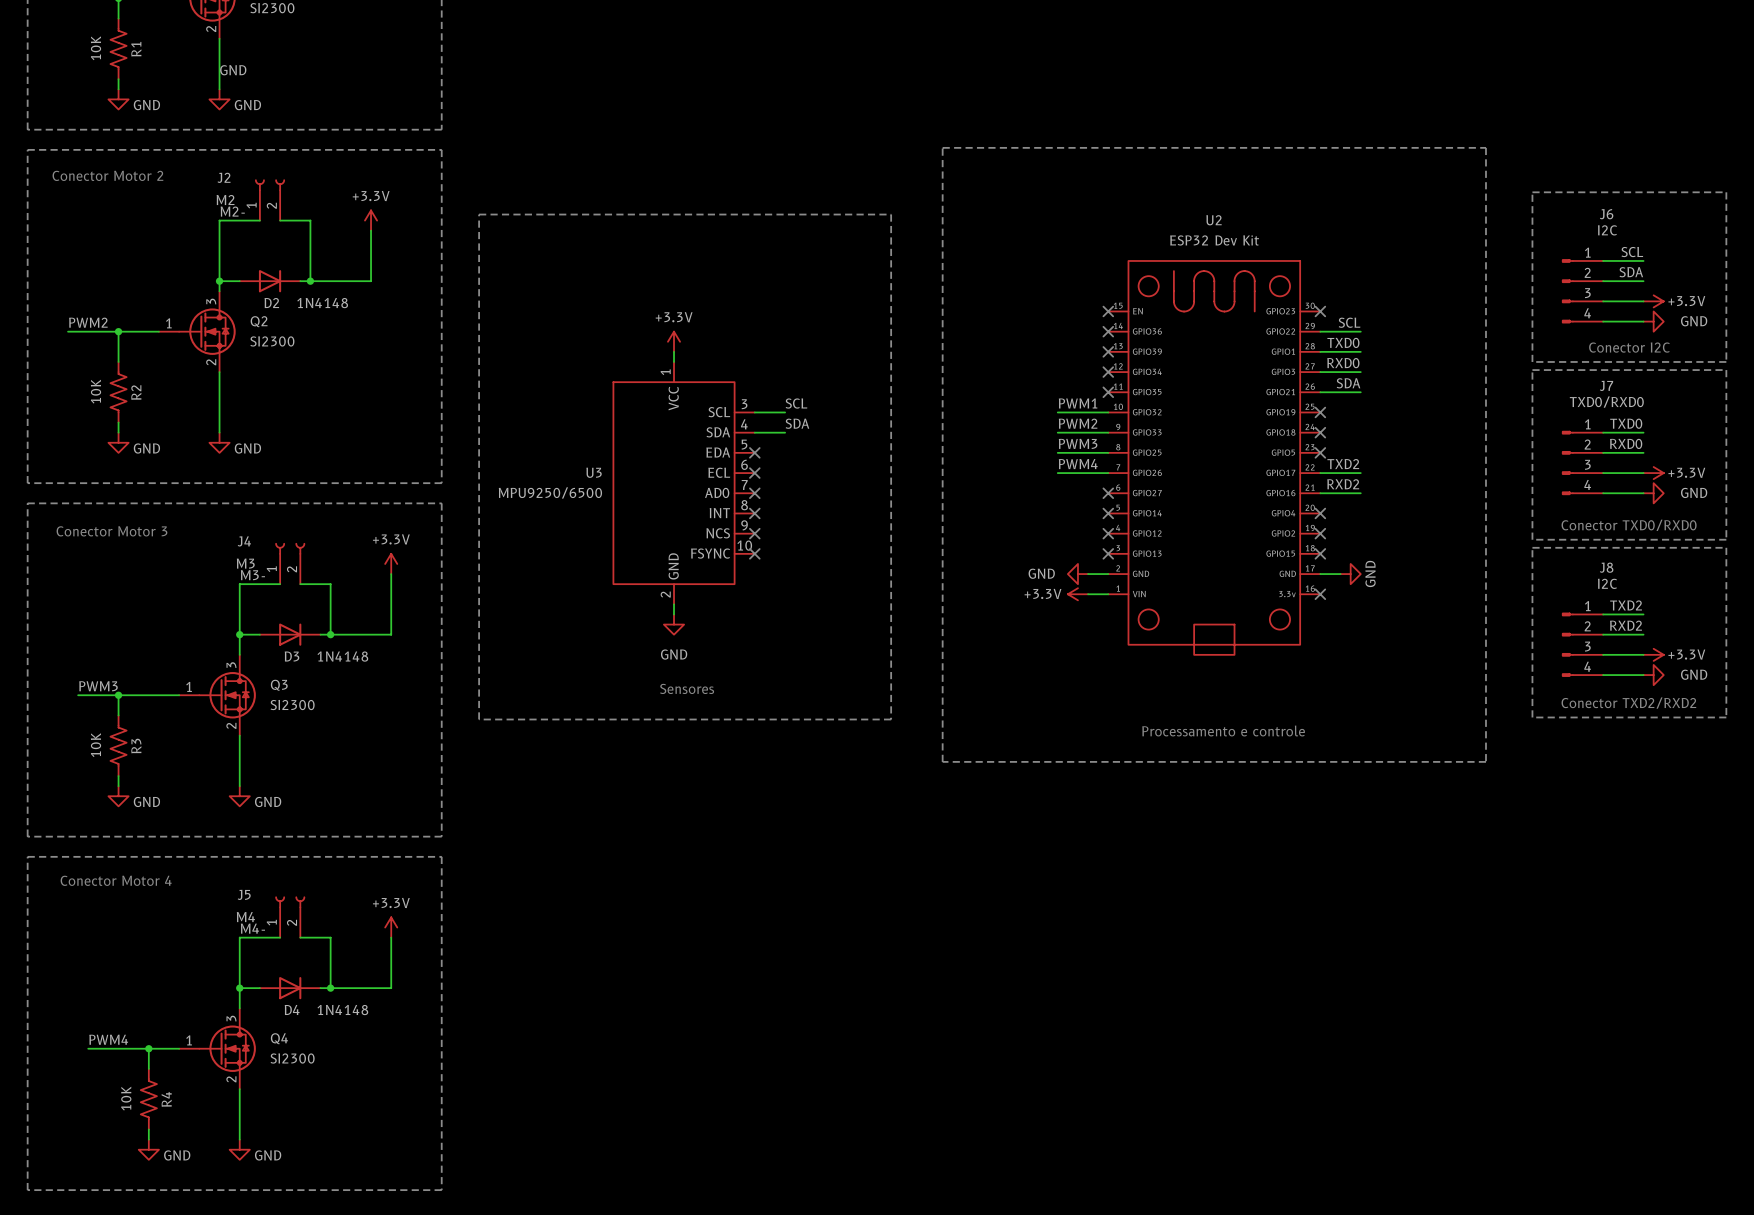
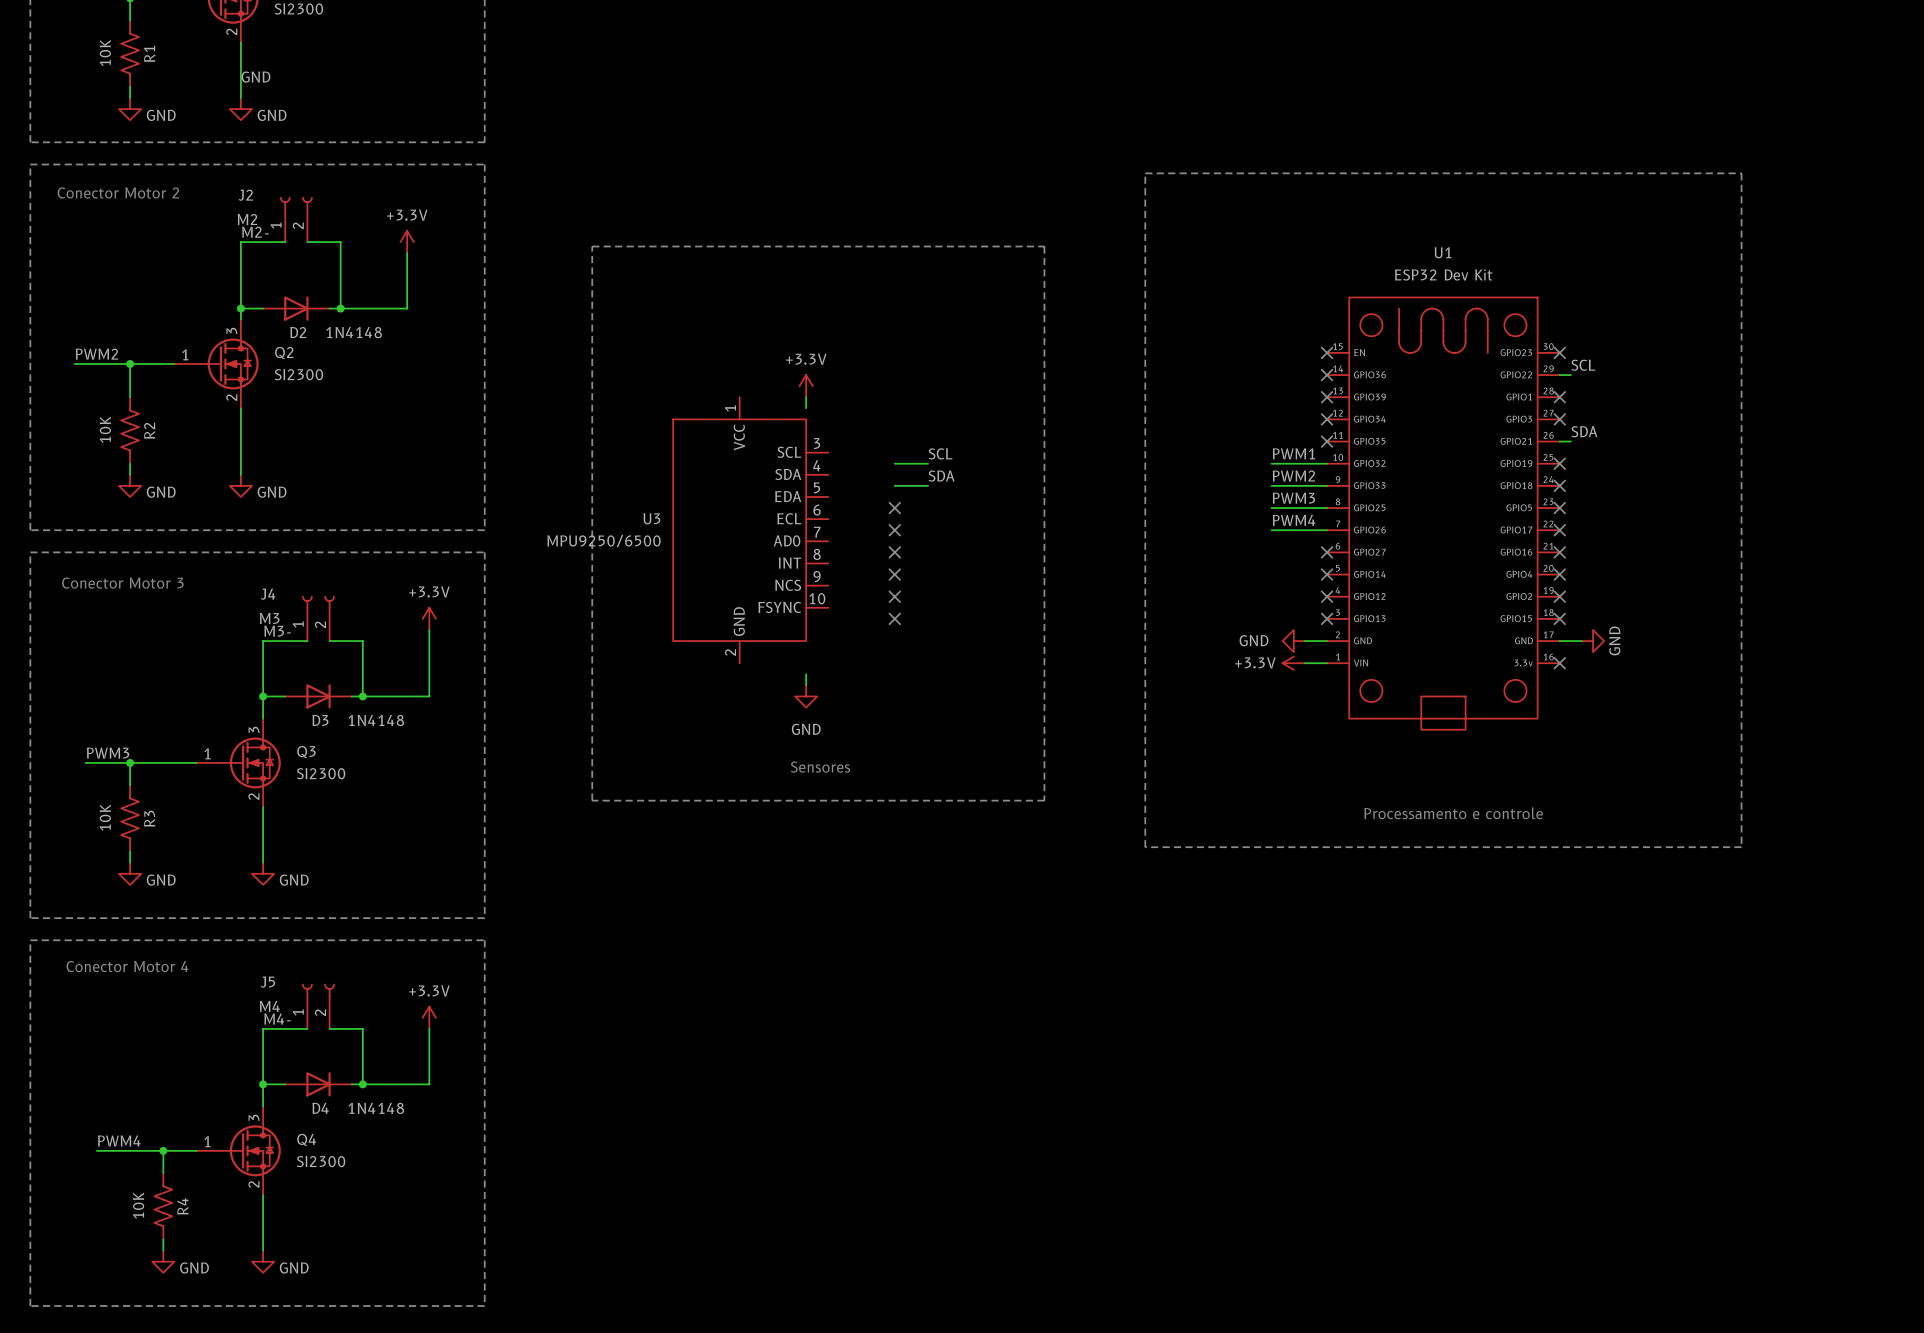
line: (942, 147) (1485, 147) (1485, 761) (942, 761) (942, 147) -> (1145, 173) (1741, 173) (1741, 847) (1145, 847) (1145, 173)
line: (1532, 192) (1532, 361) (1726, 361) (1726, 192) (1532, 192) -> none
line: (479, 214) (891, 214) (891, 719) (479, 719) (479, 214) -> (592, 246) (1044, 246) (1044, 800) (592, 800) (592, 246)
label: SCL (1632, 252) -> none
wire: (1603, 260) (1643, 260) -> none
label: SDA (1631, 272) -> none
wire: (1603, 281) (1643, 281) -> none
J6: I2C (1582, 291) -> none
wire: (1603, 301) (1643, 301) -> none
power symbol: +3.3V (1653, 301) -> none
no-connect mark: (1108, 311) -> none
no-connect mark: (1320, 311) -> none
no-connect mark: none -> (1327, 352)
no-connect mark: none -> (1559, 352)
wire: (1603, 321) (1643, 321) -> none
power symbol: GND (1653, 321) -> none
label position: SCL (1349, 322) -> SCL (1583, 365)
no-connect mark: (1108, 331) -> none
wire: (1320, 331) (1360, 331) -> none
power symbol position: +3.3V (674, 341) -> +3.3V (806, 386)
no-connect mark: none -> (1327, 375)
wire: none -> (1559, 375) (1570, 375)
label: TXD0 (1343, 342) -> none
text: Conector I2C (1629, 347) -> none
wire: (674, 351) (674, 361) -> (806, 397) (806, 408)
no-connect mark: (1108, 351) -> none
wire: (1320, 351) (1360, 351) -> none
no-connect mark: none -> (1327, 397)
no-connect mark: none -> (1559, 397)
label: RXD0 (1343, 363) -> none
line: (1532, 370) (1726, 370) (1726, 539) (1532, 539) (1532, 370) -> none
no-connect mark: (1108, 372) -> none
wire: (1320, 372) (1360, 372) -> none
no-connect mark: none -> (1327, 419)
no-connect mark: none -> (1559, 419)
label position: SDA (1348, 383) -> SDA (1584, 431)
no-connect mark: (1108, 392) -> none
wire: (1320, 392) (1360, 392) -> none
no-connect mark: none -> (1327, 441)
wire: none -> (1559, 441) (1570, 441)
label position: SCL (796, 403) -> SCL (940, 453)
label position: PWM1 (1078, 403) -> PWM1 (1293, 453)
wire: (754, 412) (785, 412) -> (894, 463) (928, 463)
wire: (1057, 412) (1108, 412) -> (1271, 463) (1327, 463)
no-connect mark: (1320, 412) -> none
no-connect mark: none -> (1559, 463)
label position: SDA (797, 423) -> SDA (941, 476)
label position: PWM2 (1078, 423) -> PWM2 (1293, 476)
label: TXD0 (1626, 423) -> none
wire: (754, 432) (785, 432) -> (894, 485) (928, 485)
wire: (1057, 432) (1108, 432) -> (1271, 485) (1327, 485)
no-connect mark: (1320, 432) -> none
wire: (1603, 432) (1643, 432) -> none
no-connect mark: none -> (1559, 485)
label position: PWM3 (1078, 443) -> PWM3 (1293, 498)
label: RXD0 (1626, 443) -> none
no-connect mark: (754, 452) -> none
wire: (1057, 452) (1108, 452) -> (1271, 508) (1327, 508)
no-connect mark: (1320, 452) -> none
wire: (1603, 452) (1643, 452) -> none
U2: ESP32 Dev Kit (1214, 457) -> none
no-connect mark: none -> (894, 508)
no-connect mark: none -> (1559, 508)
J7: TXD0/RXD0 (1582, 462) -> none
label position: PWM4 (1078, 464) -> PWM4 (1294, 520)
label: TXD2 (1343, 464) -> none
U1: none -> ESP32 Dev Kit (1443, 513)
no-connect mark: (754, 473) -> none
wire: (1057, 473) (1108, 473) -> (1271, 530) (1327, 530)
wire: (1320, 473) (1360, 473) -> none
wire: (1603, 473) (1643, 473) -> none
power symbol: +3.3V (1653, 473) -> none
no-connect mark: none -> (894, 530)
no-connect mark: none -> (1559, 530)
label: RXD2 (1343, 484) -> none
no-connect mark: (754, 493) -> none
no-connect mark: (1108, 493) -> none
wire: (1320, 493) (1360, 493) -> none
wire: (1603, 493) (1643, 493) -> none
power symbol: GND (1653, 493) -> none
no-connect mark: none -> (894, 552)
no-connect mark: none -> (1327, 552)
no-connect mark: none -> (1559, 552)
no-connect mark: (754, 513) -> none
no-connect mark: (1108, 513) -> none
no-connect mark: (1320, 513) -> none
no-connect mark: none -> (894, 574)
no-connect mark: none -> (1327, 574)
no-connect mark: none -> (1559, 574)
text: Conector TXD0/RXD0 (1629, 525) -> none
no-connect mark: (754, 533) -> none
no-connect mark: (1108, 533) -> none
no-connect mark: (1320, 533) -> none
no-connect mark: none -> (894, 596)
no-connect mark: none -> (1327, 596)
no-connect mark: none -> (1559, 596)
line: (1532, 547) (1532, 717) (1726, 717) (1726, 547) (1532, 547) -> none
no-connect mark: (754, 553) -> none
no-connect mark: (1108, 553) -> none
no-connect mark: (1320, 553) -> none
no-connect mark: none -> (894, 618)
no-connect mark: none -> (1327, 618)
no-connect mark: none -> (1559, 618)
power symbol: GND (1077, 574) -> none
wire: (1088, 574) (1108, 574) -> (1304, 641) (1327, 641)
wire: (1320, 574) (1340, 574) -> (1559, 641) (1581, 641)
power symbol: GND (1350, 574) -> none
power symbol: none -> GND (1293, 641)
power symbol: none -> GND (1593, 641)
power symbol position: +3.3V (1077, 594) -> +3.3V (1293, 663)
wire: (1088, 594) (1108, 594) -> (1304, 663) (1327, 663)
no-connect mark: (1320, 594) -> none
wire: (674, 604) (674, 614) -> (806, 674) (806, 685)
no-connect mark: none -> (1559, 663)
label: TXD2 (1626, 605) -> none
wire: (1603, 614) (1643, 614) -> none
power symbol position: GND (674, 624) -> GND (806, 696)
label: RXD2 (1625, 625) -> none
wire: (1603, 634) (1643, 634) -> none
J8: I2C (1582, 644) -> none
wire: (1603, 654) (1643, 654) -> none
power symbol: +3.3V (1653, 654) -> none
wire: (1603, 675) (1643, 675) -> none
power symbol: GND (1653, 675) -> none
text position: Sensores (687, 688) -> Sensores (820, 767)
text: Conector TXD2/RXD2 (1628, 703) -> none
text position: Processamento e controle (1223, 730) -> Processamento e controle (1453, 813)

